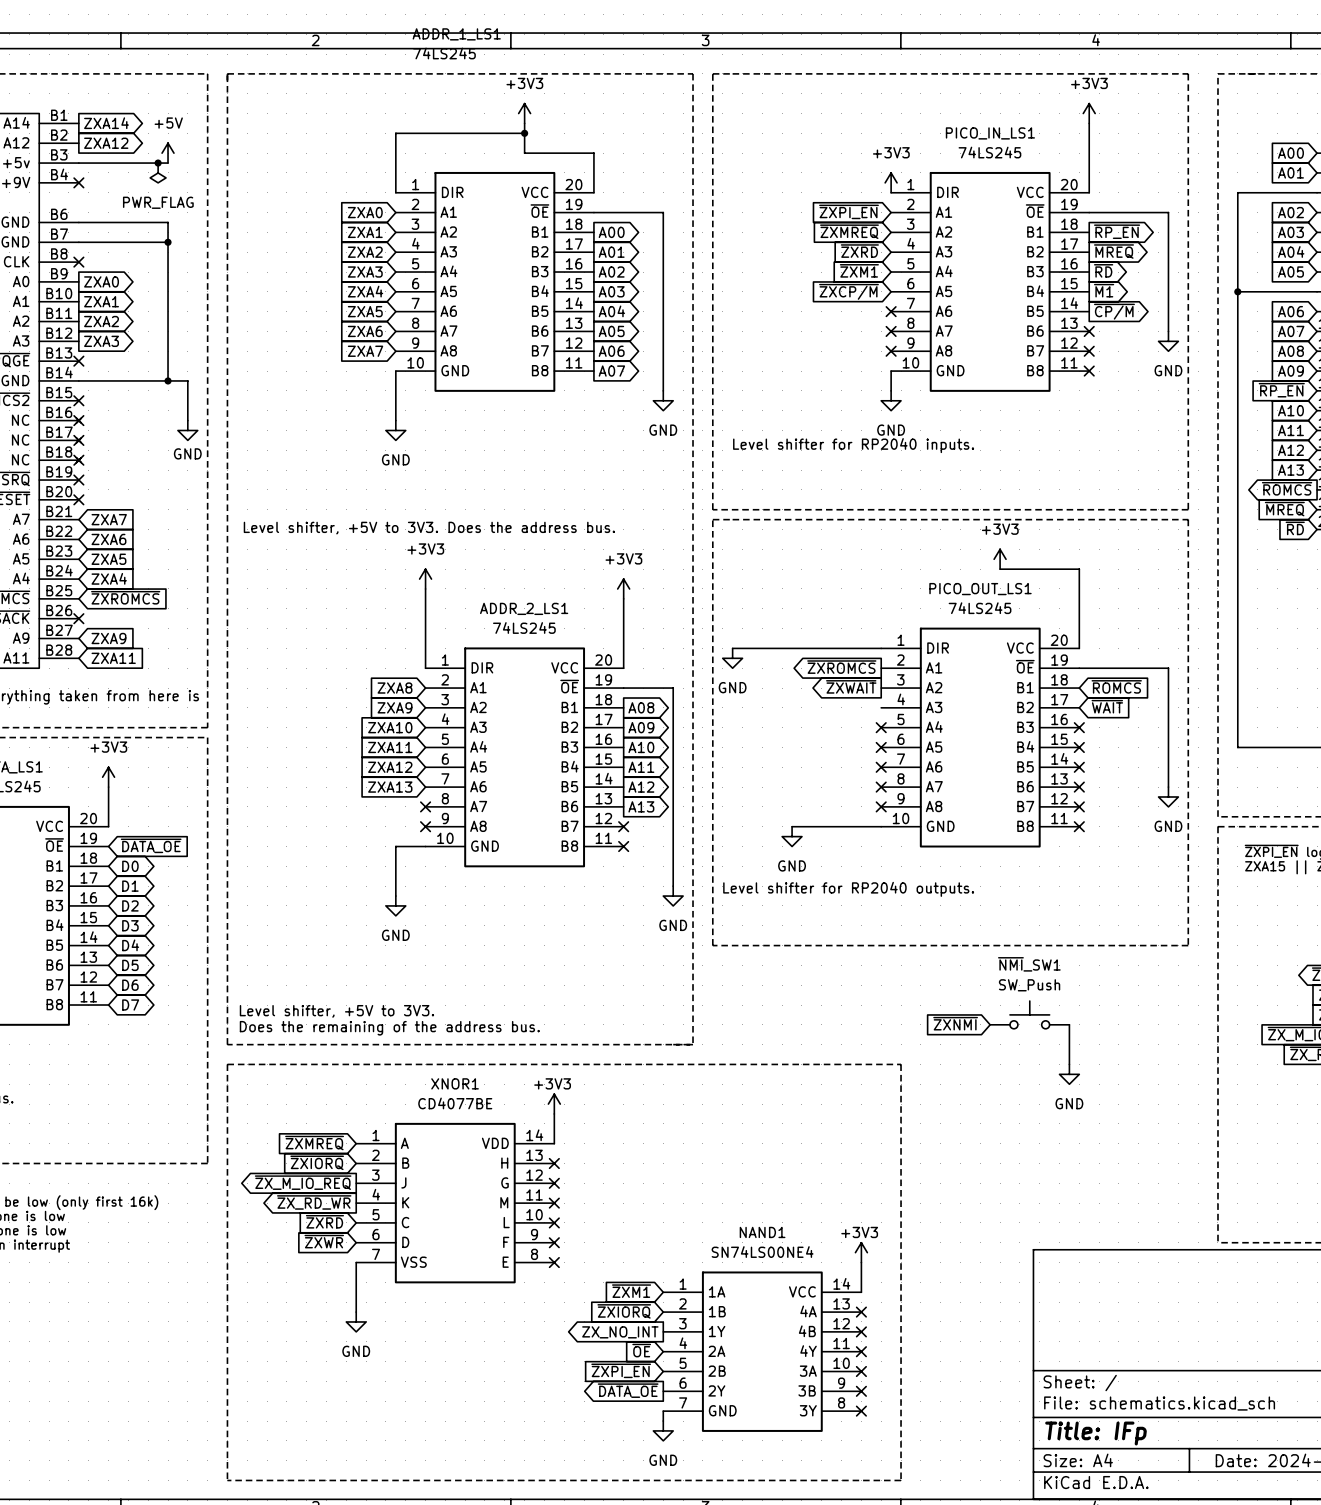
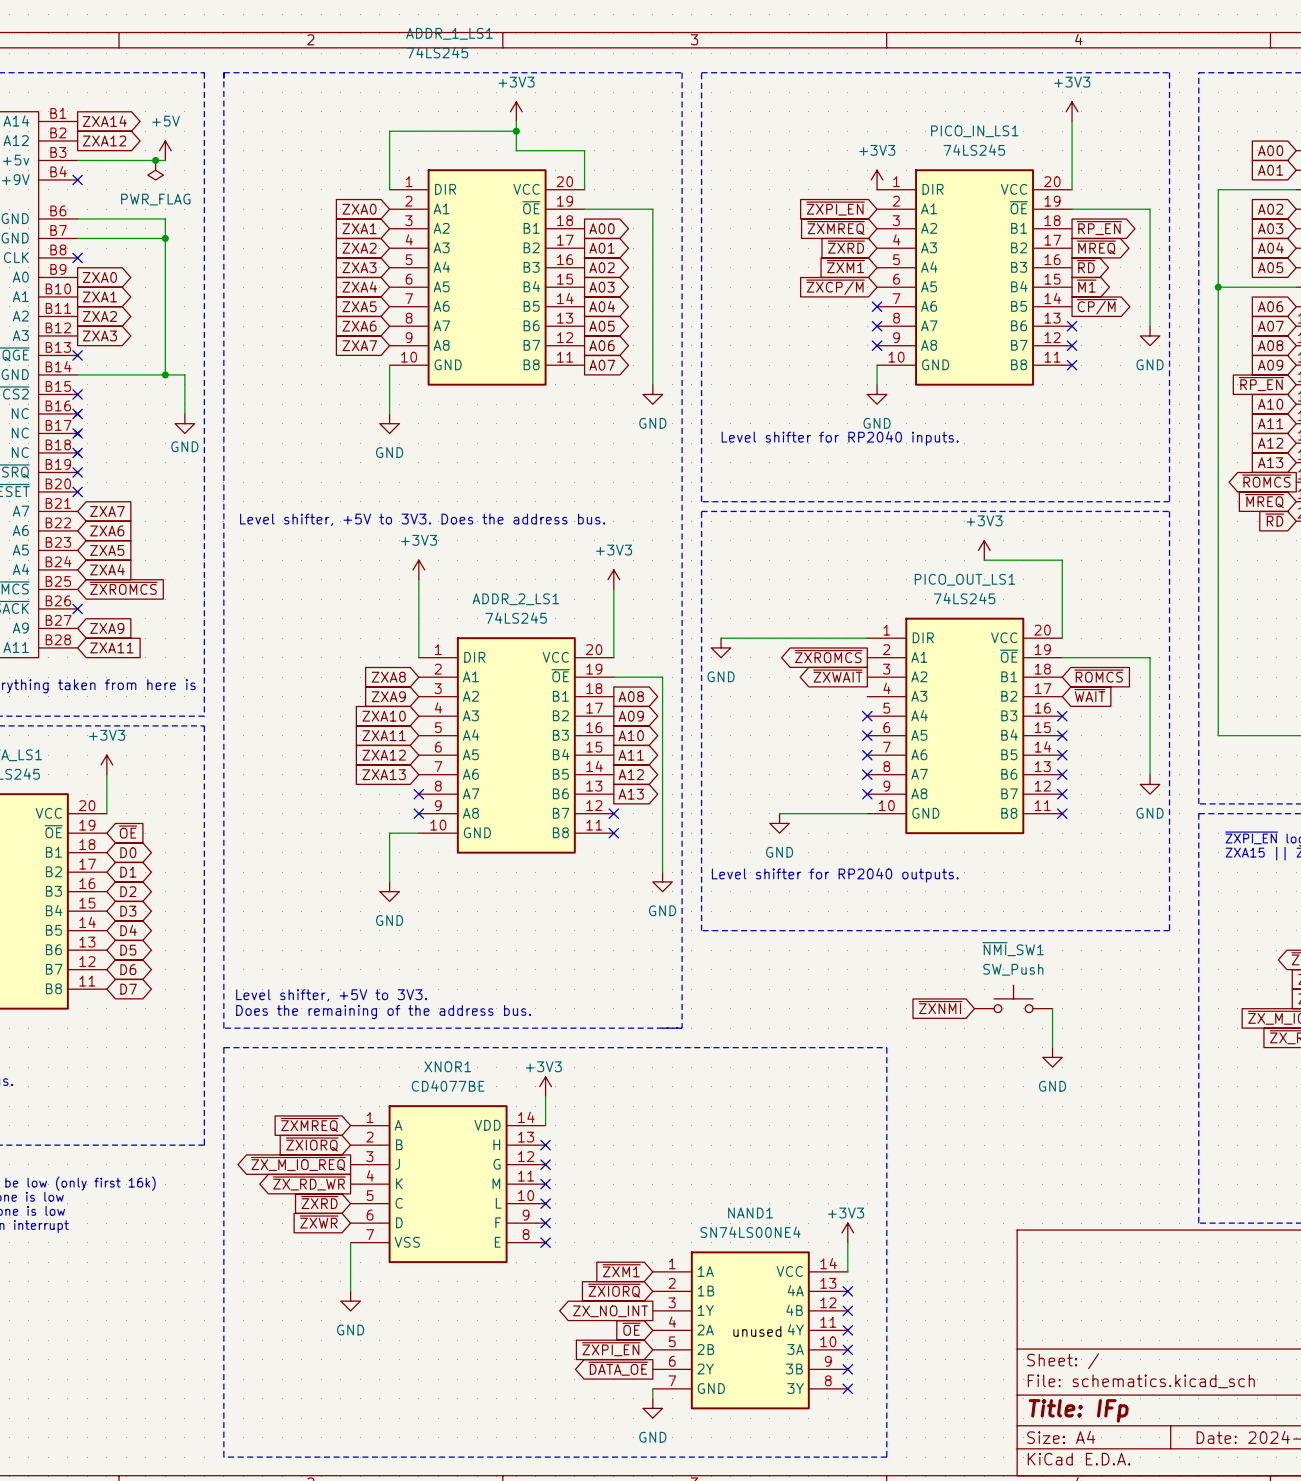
global label: ~{DATA_OE} (151, 845) -> ~{OE} (128, 832)
label: none -> unused (757, 1331)

